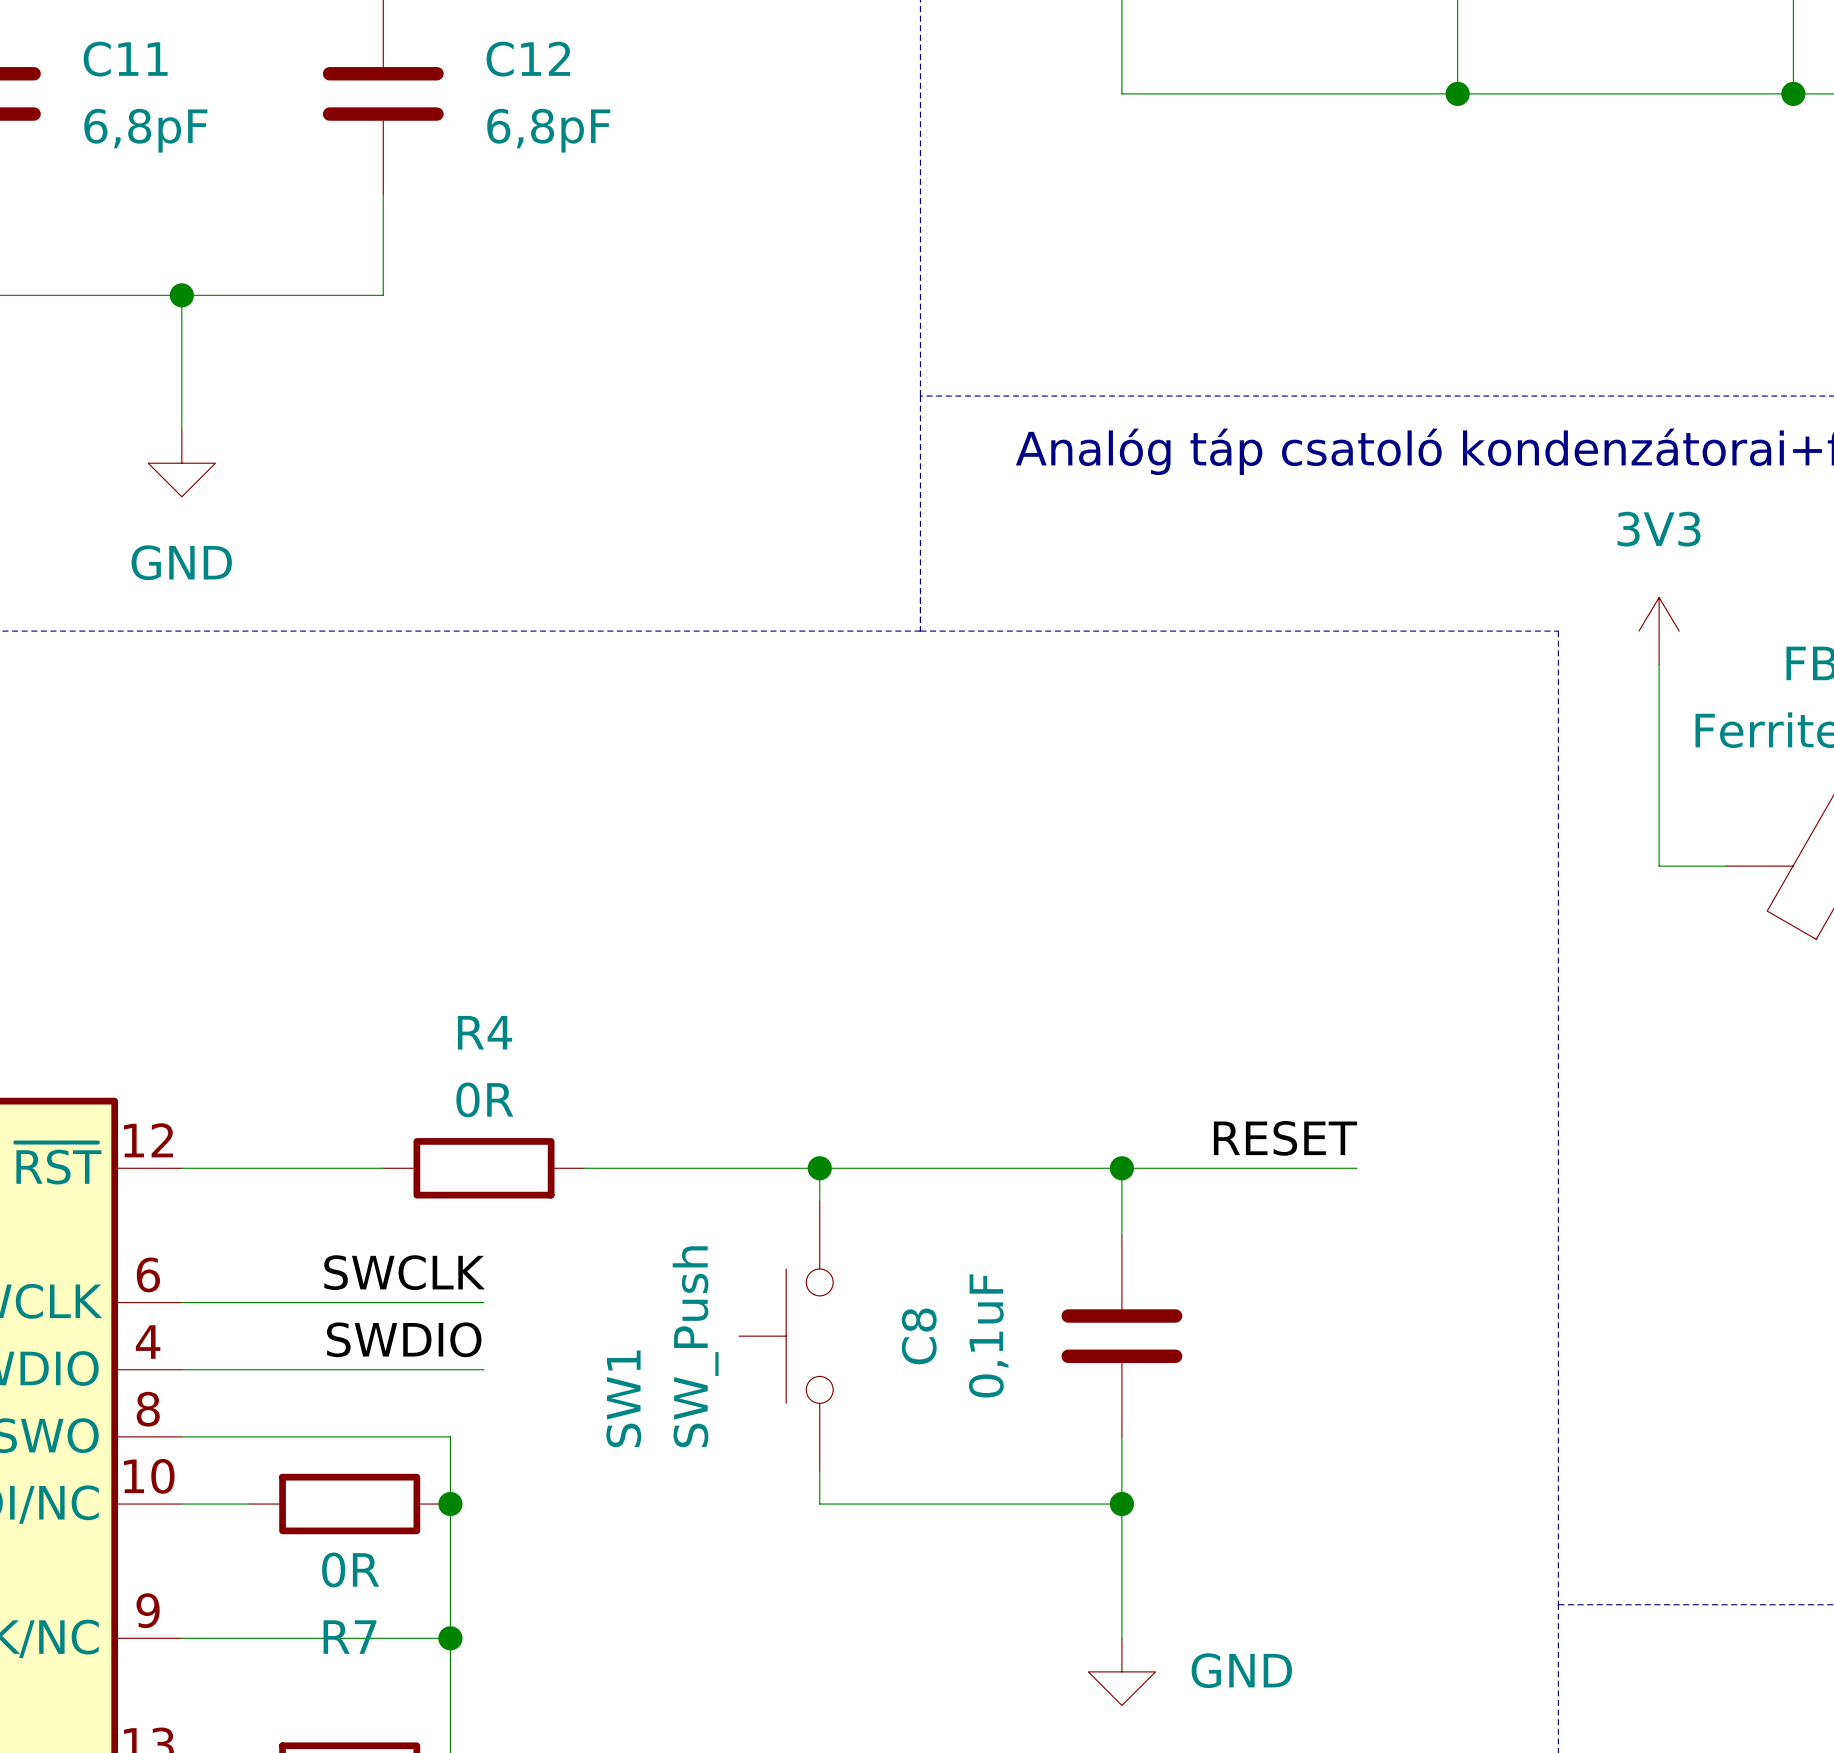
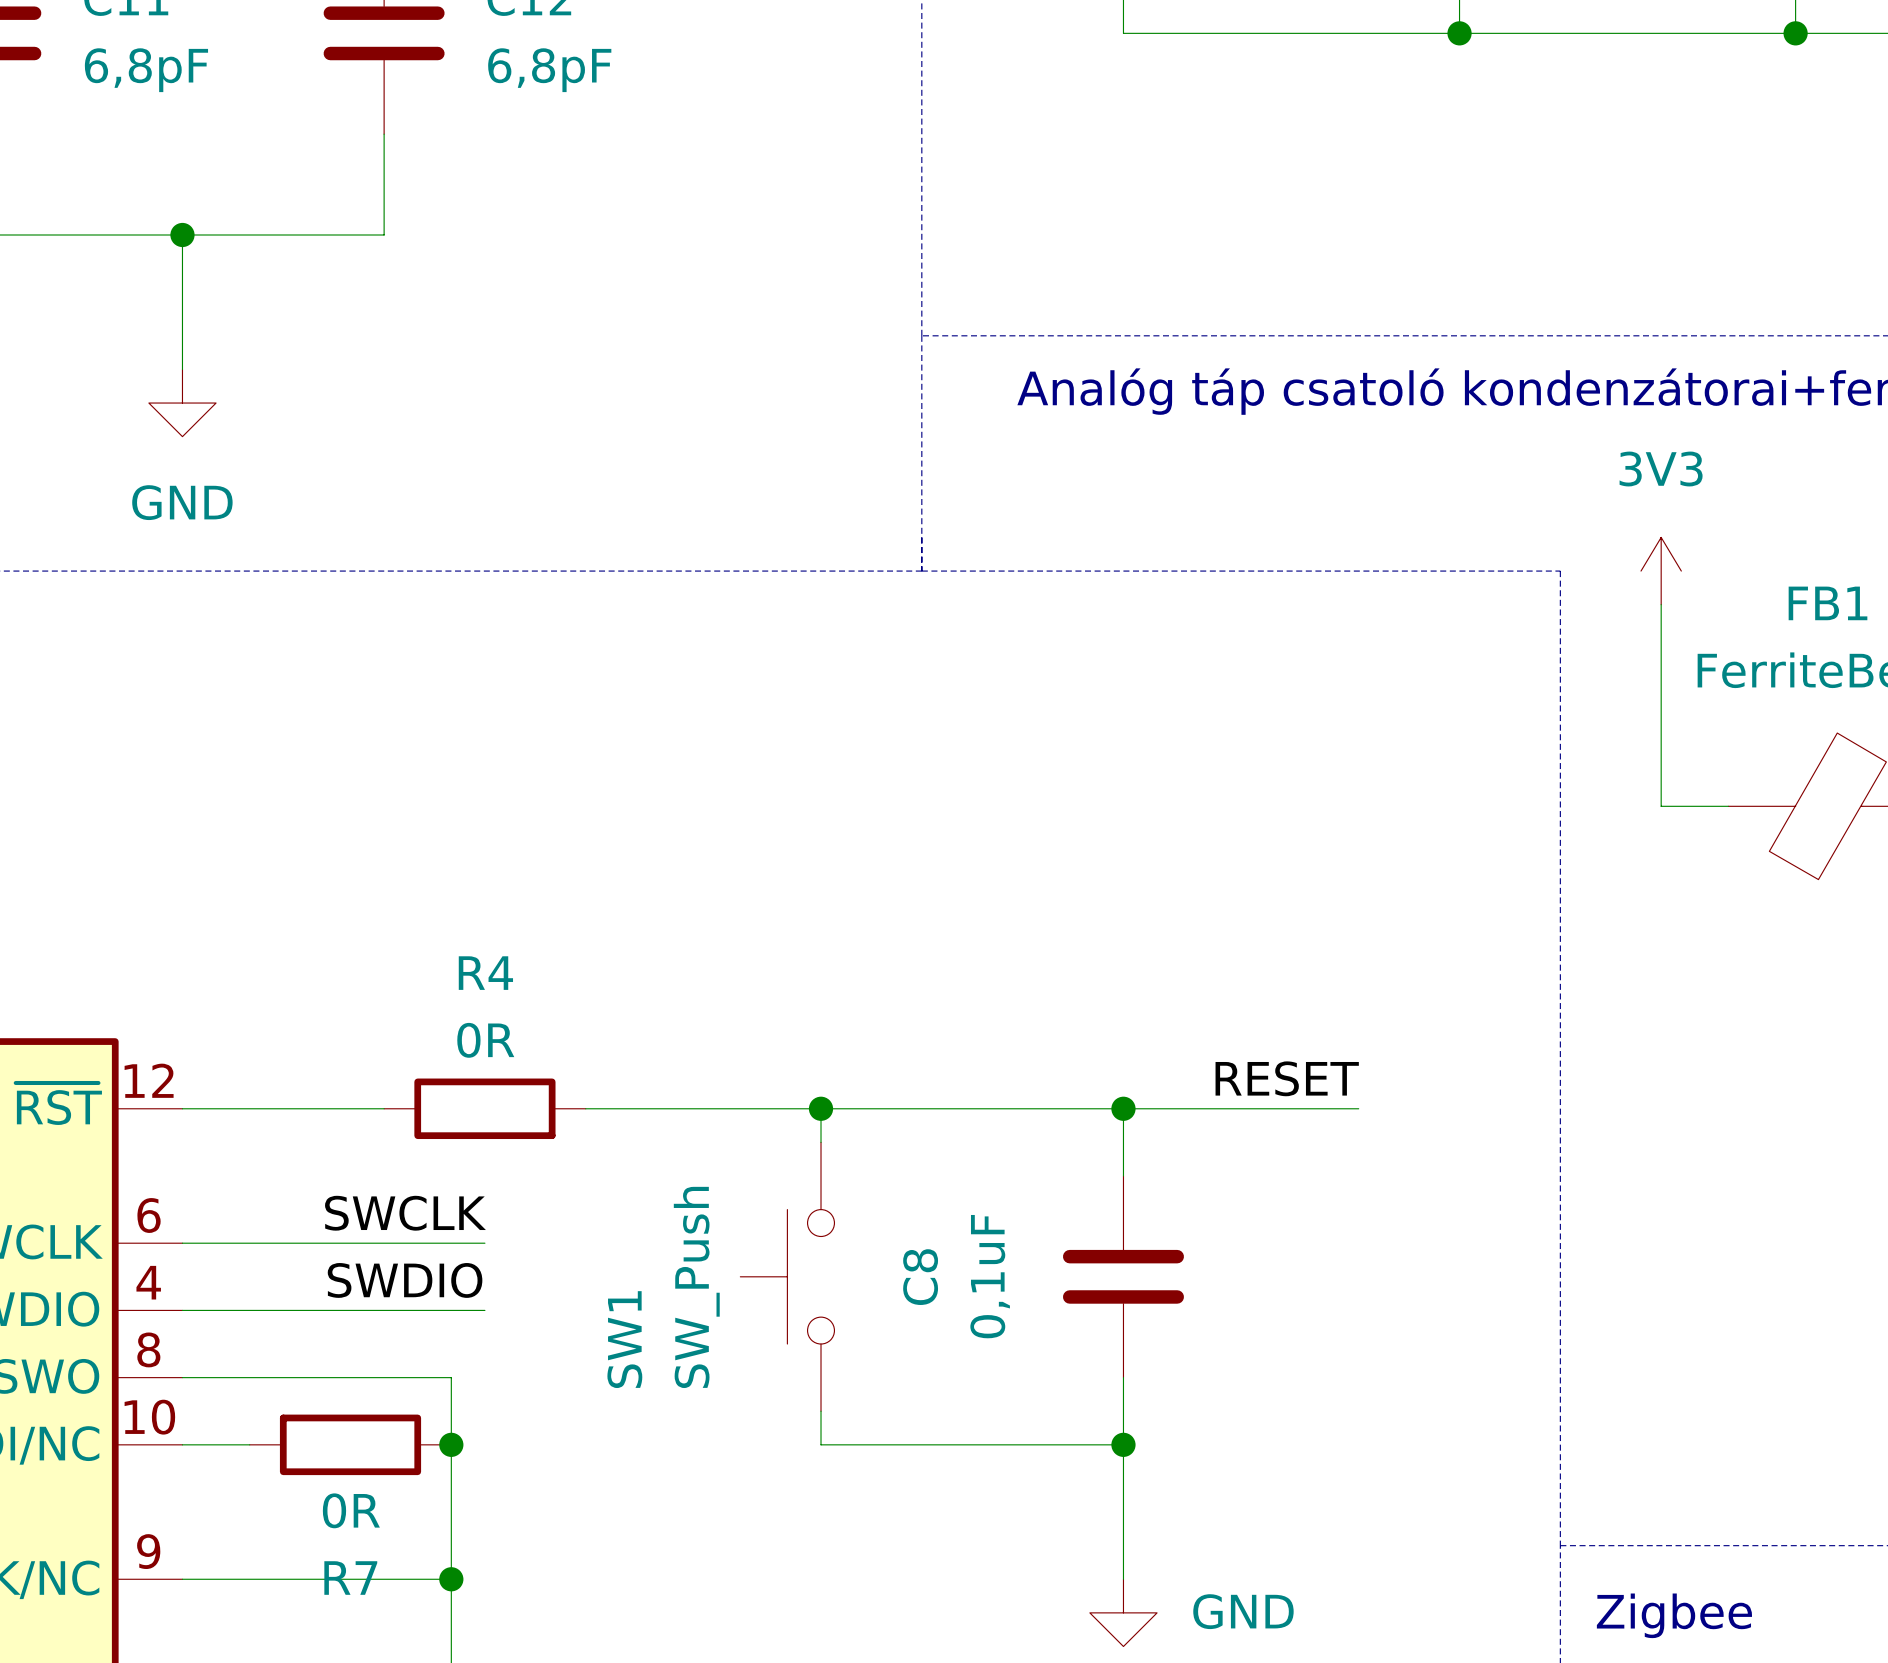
text: none -> Zigbee (1674, 1615)

